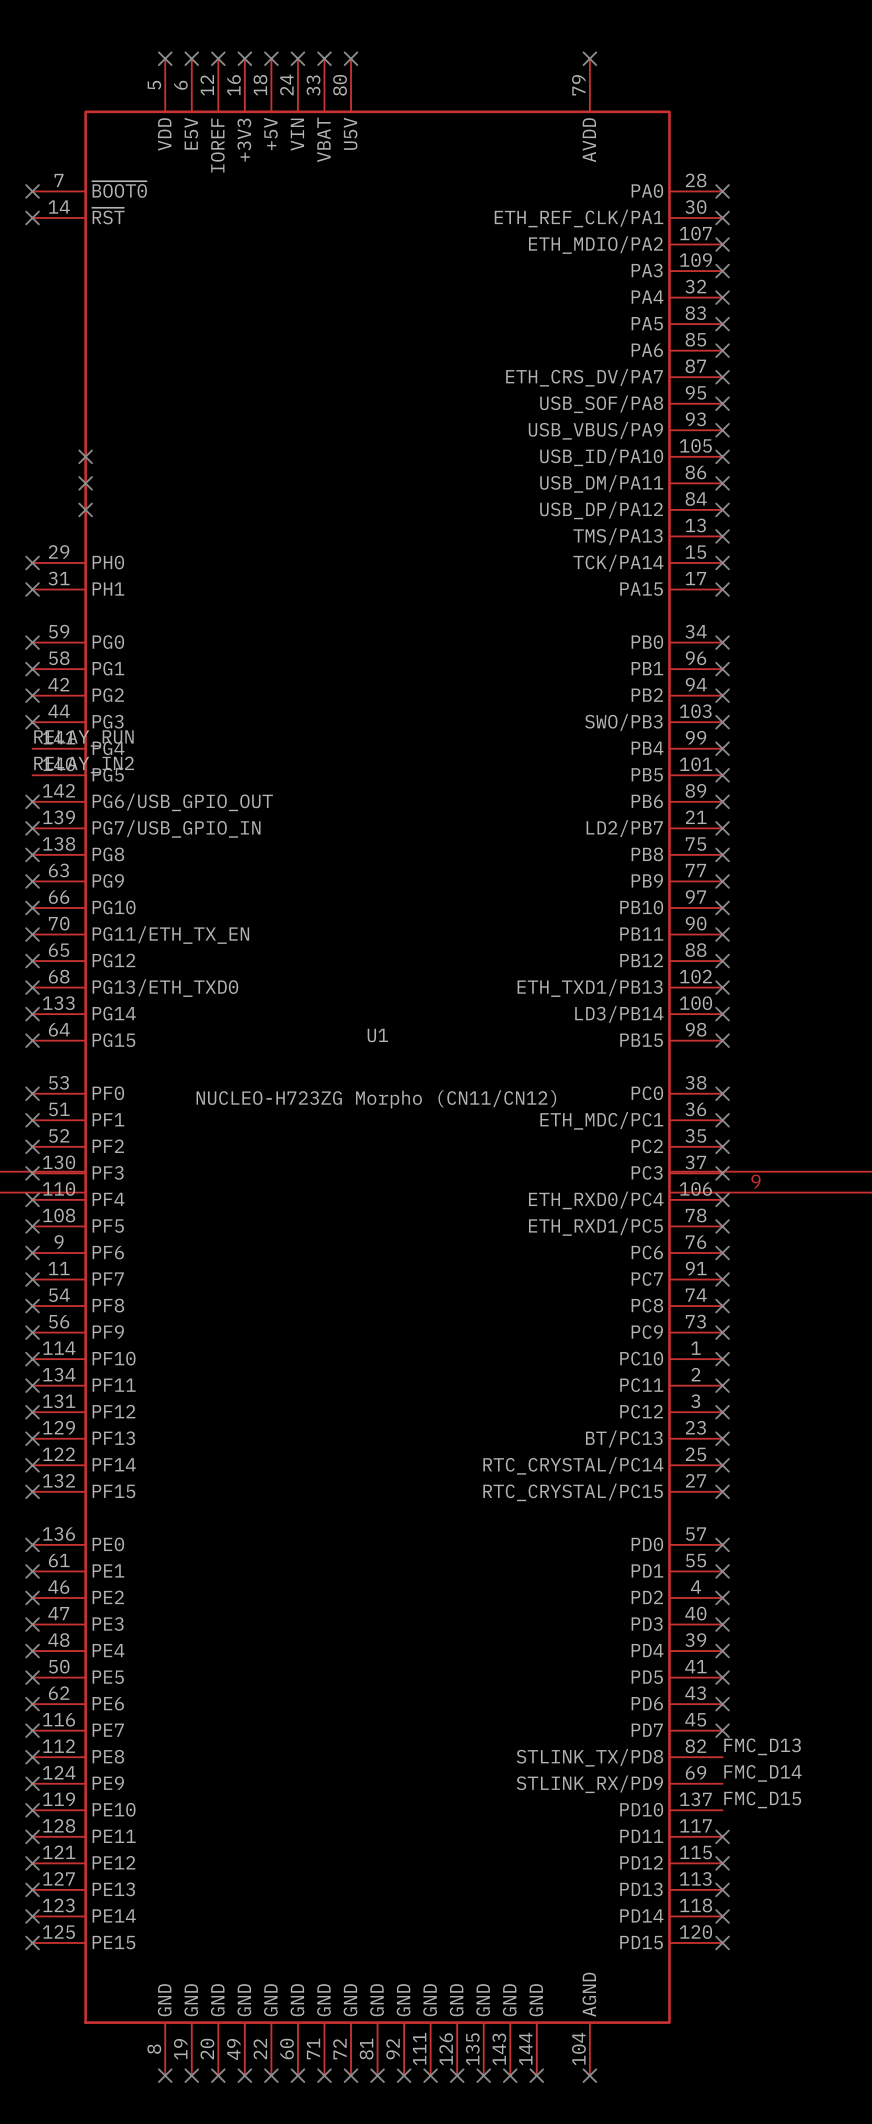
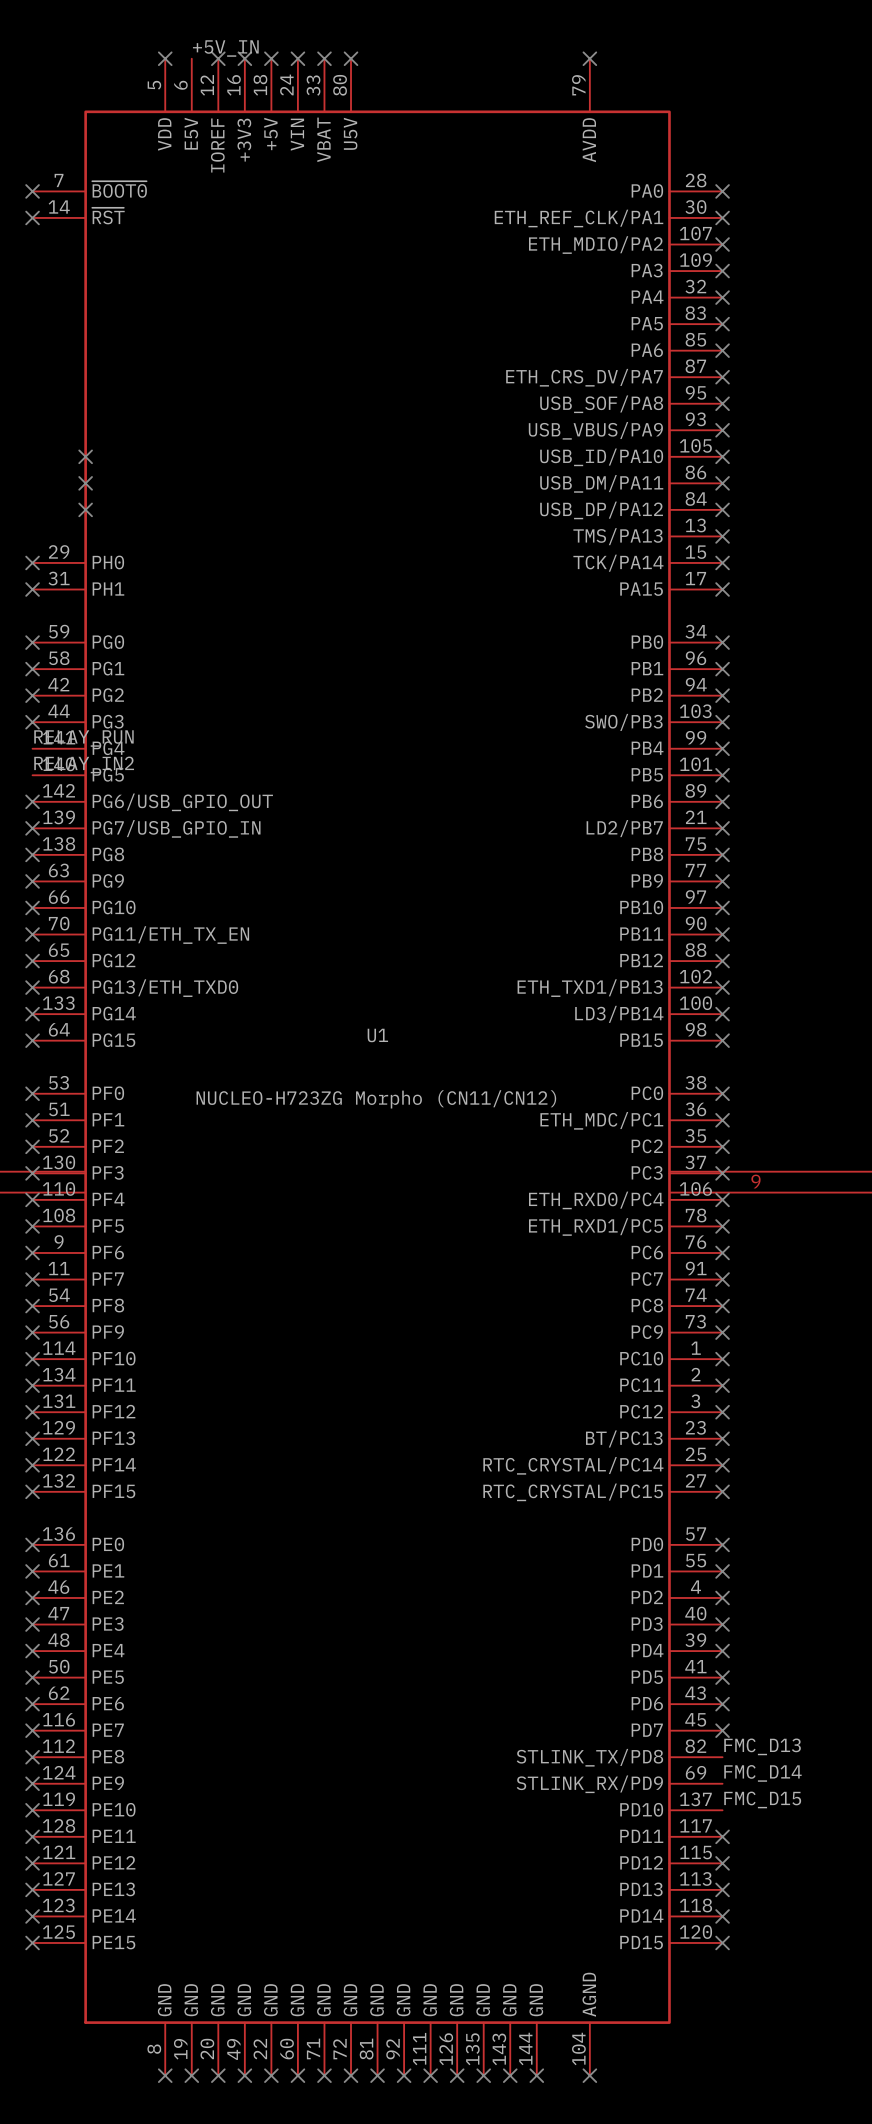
label: none -> +5V_IN (225, 48)
no-connect mark: (191, 58) -> none

